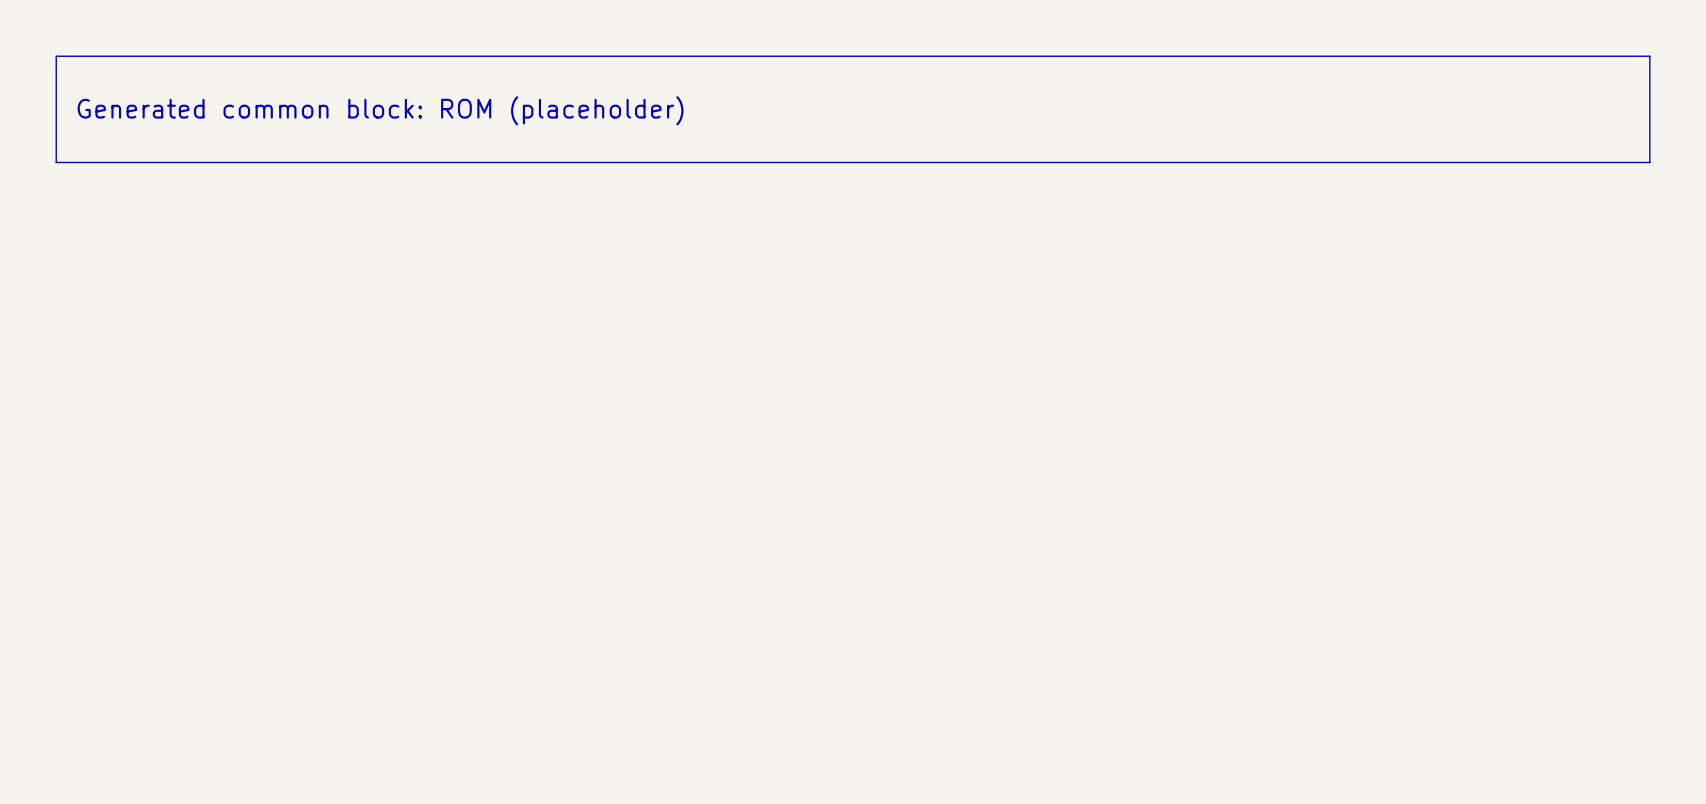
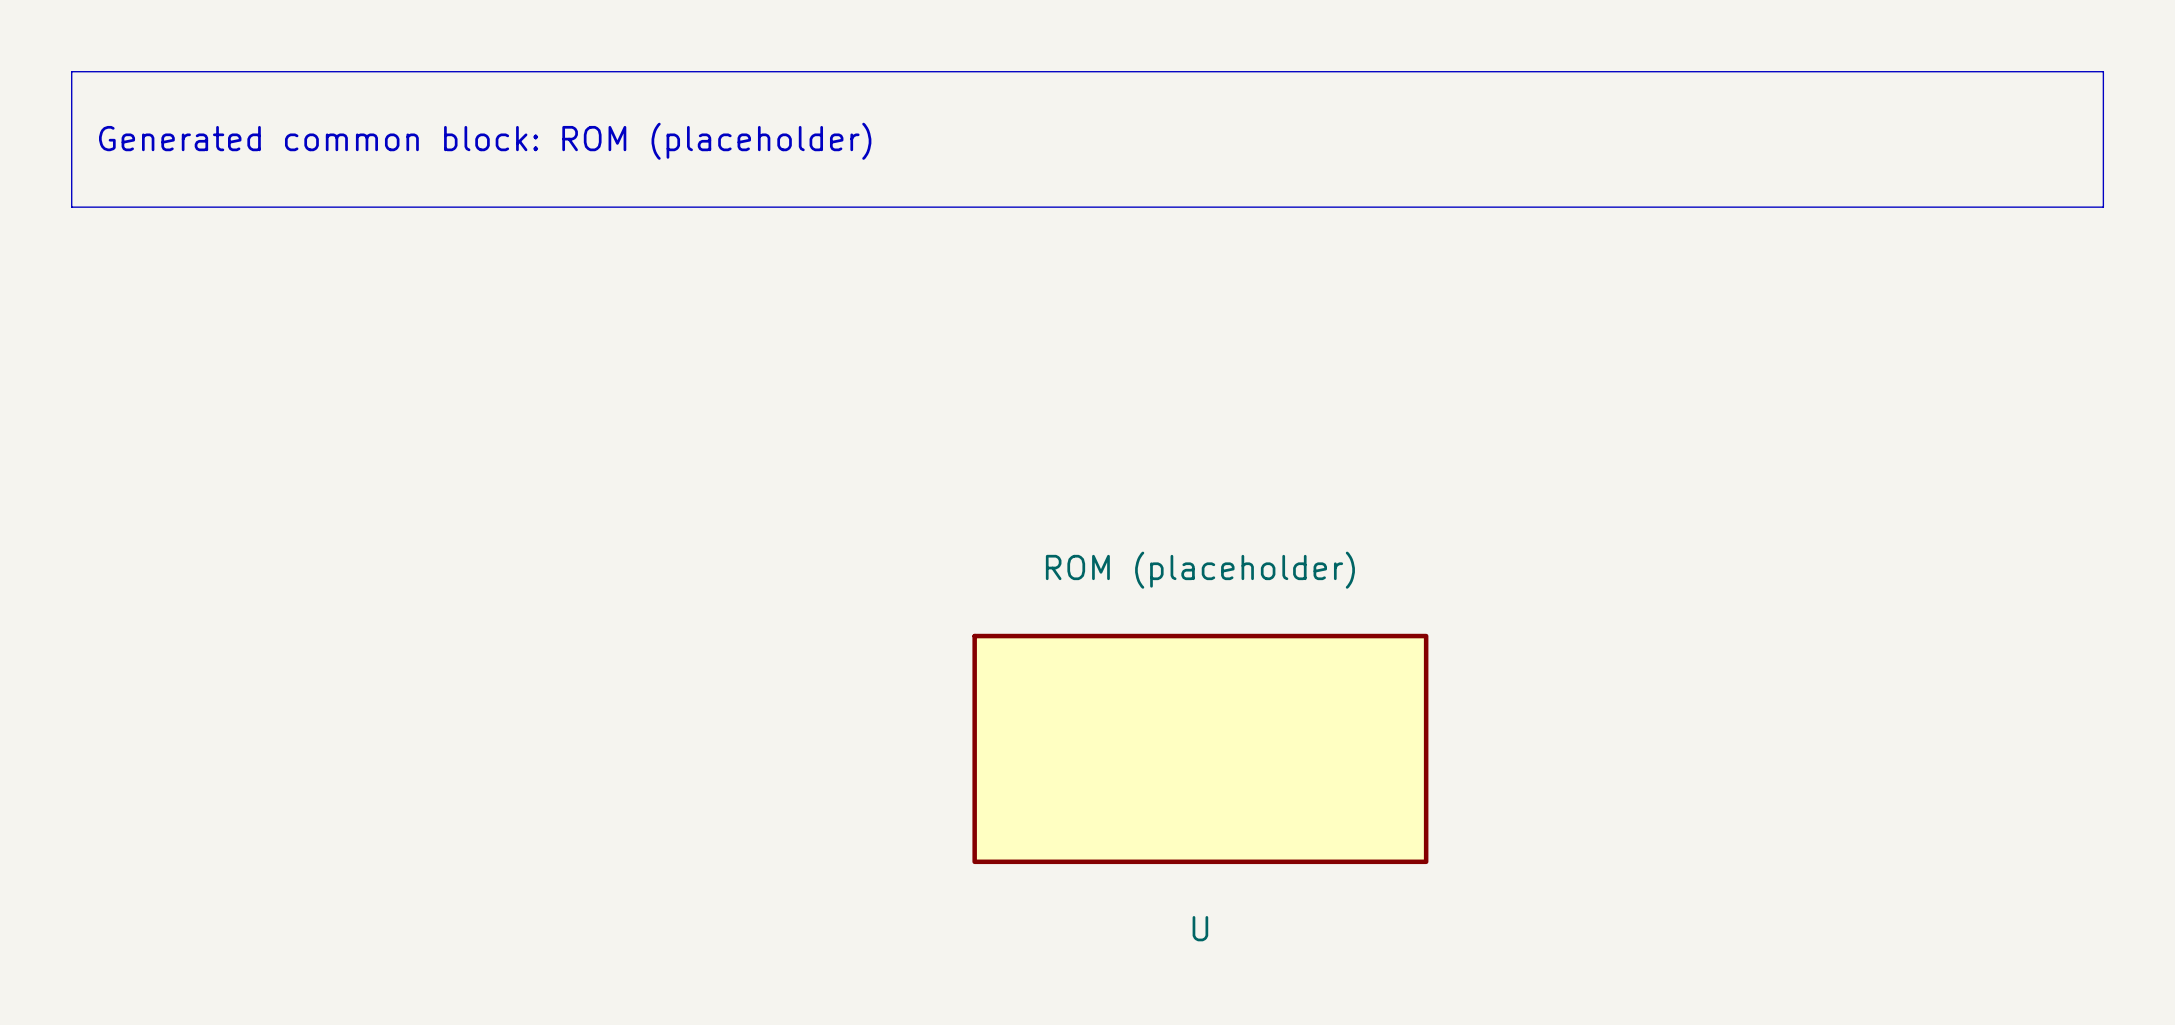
U: none -> ROM (placeholder) (1200, 748)

